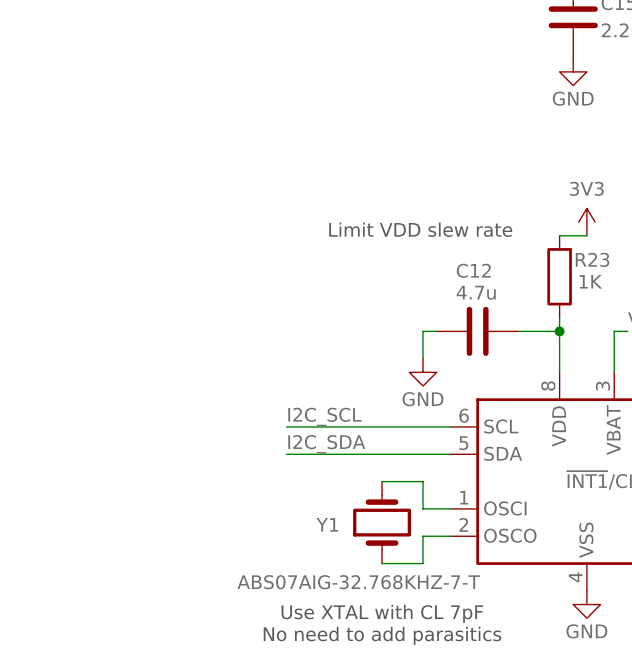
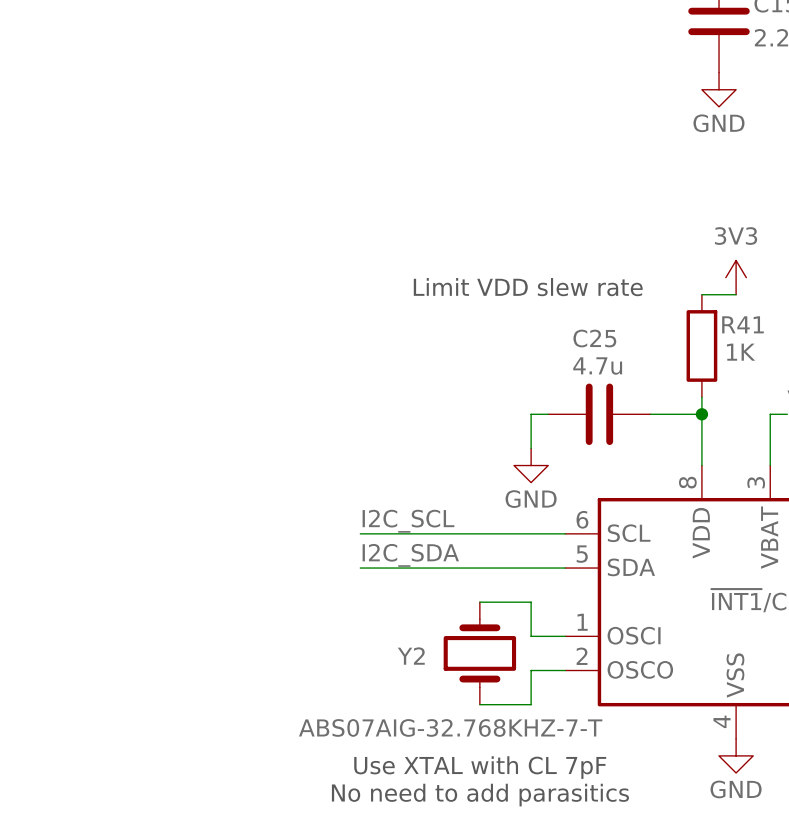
R23 name: R23 (592, 259) -> R41 (742, 324)
C12 name: C12 (473, 270) -> C25 (594, 338)
Y1 name: Y1 (327, 524) -> Y2 (411, 656)

